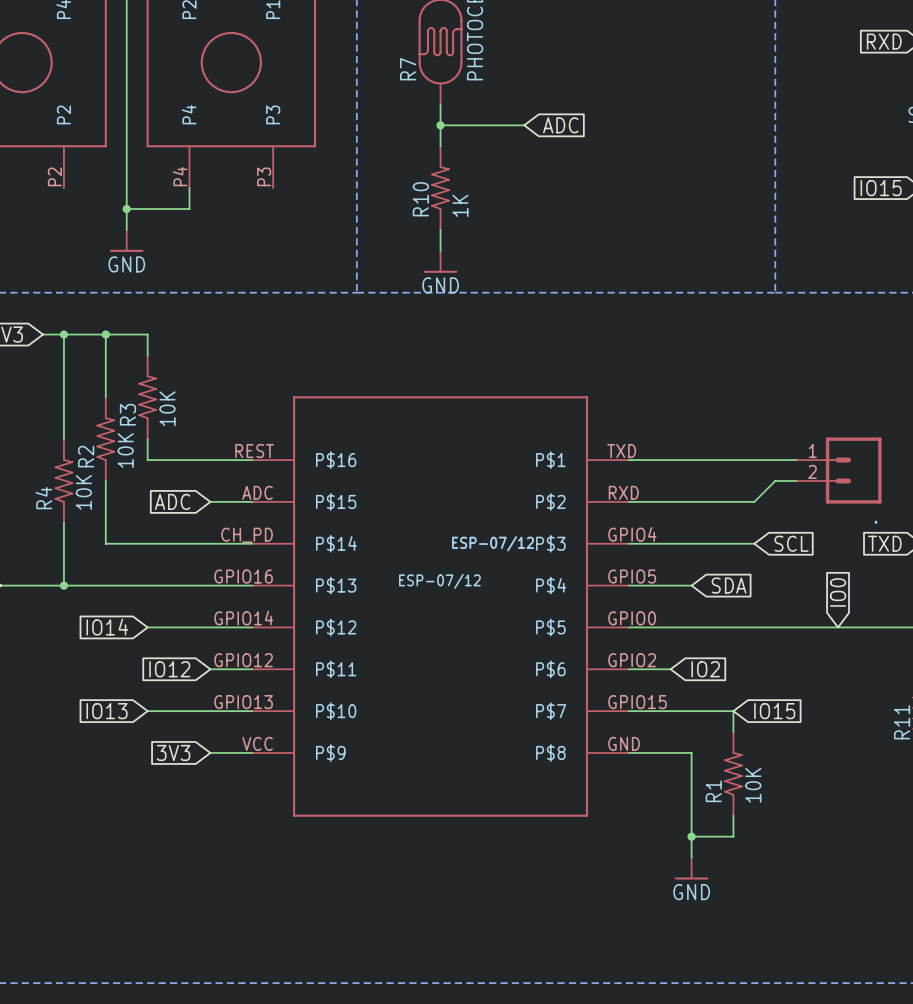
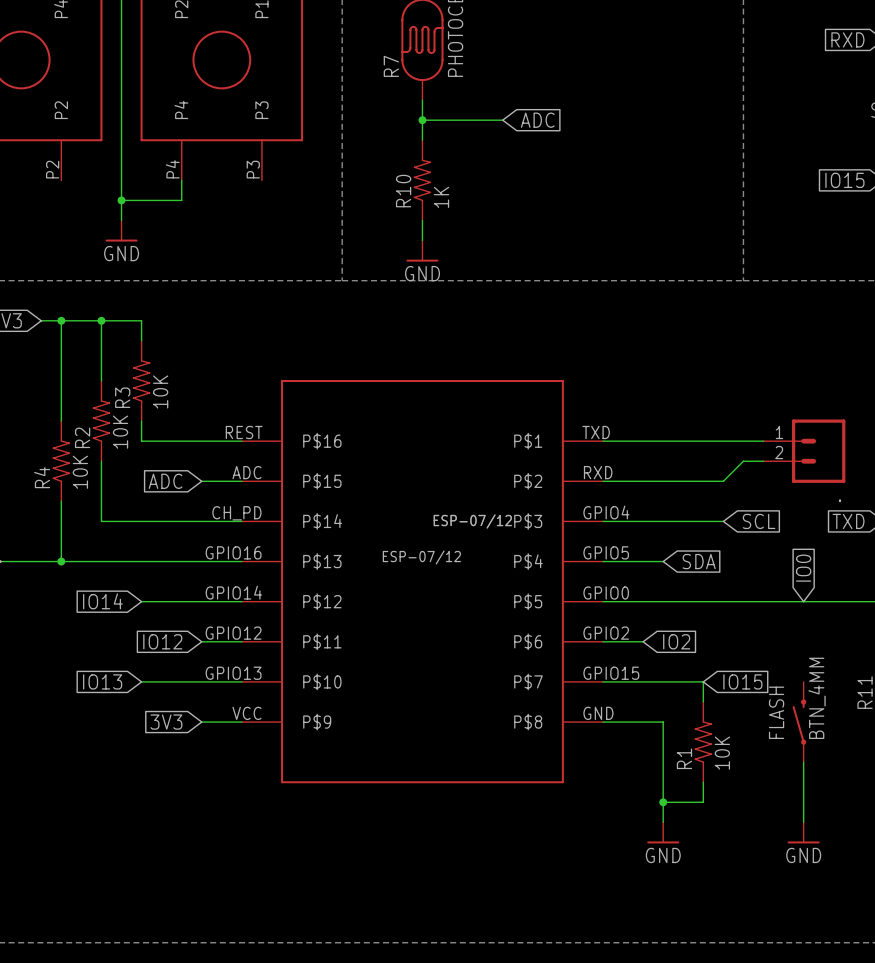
FLASH: none -> BTN_4MM (799, 722)
wire: none -> (803, 762) (803, 822)
power symbol: none -> GND (803, 832)

